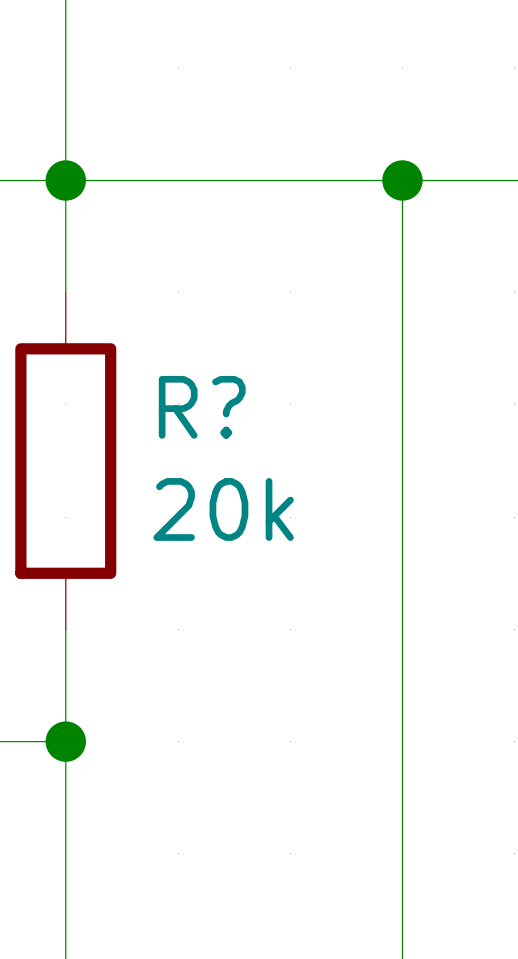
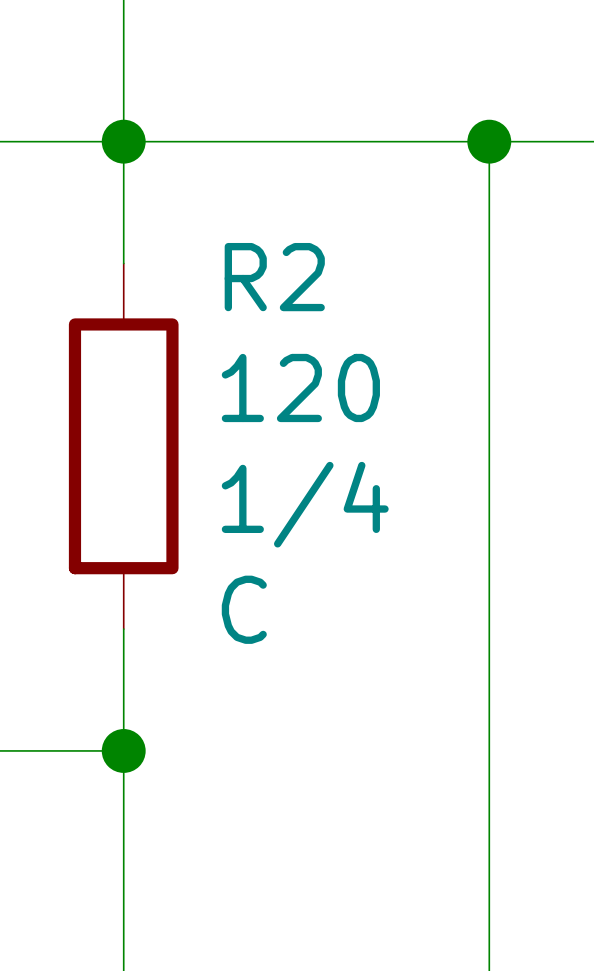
R? name: R? (202, 407) -> R2 (274, 277)
R? value: 20k (223, 509) -> 120 (300, 387)
R? text: none -> 1/4 (305, 504)
R? text: none -> C (244, 609)

